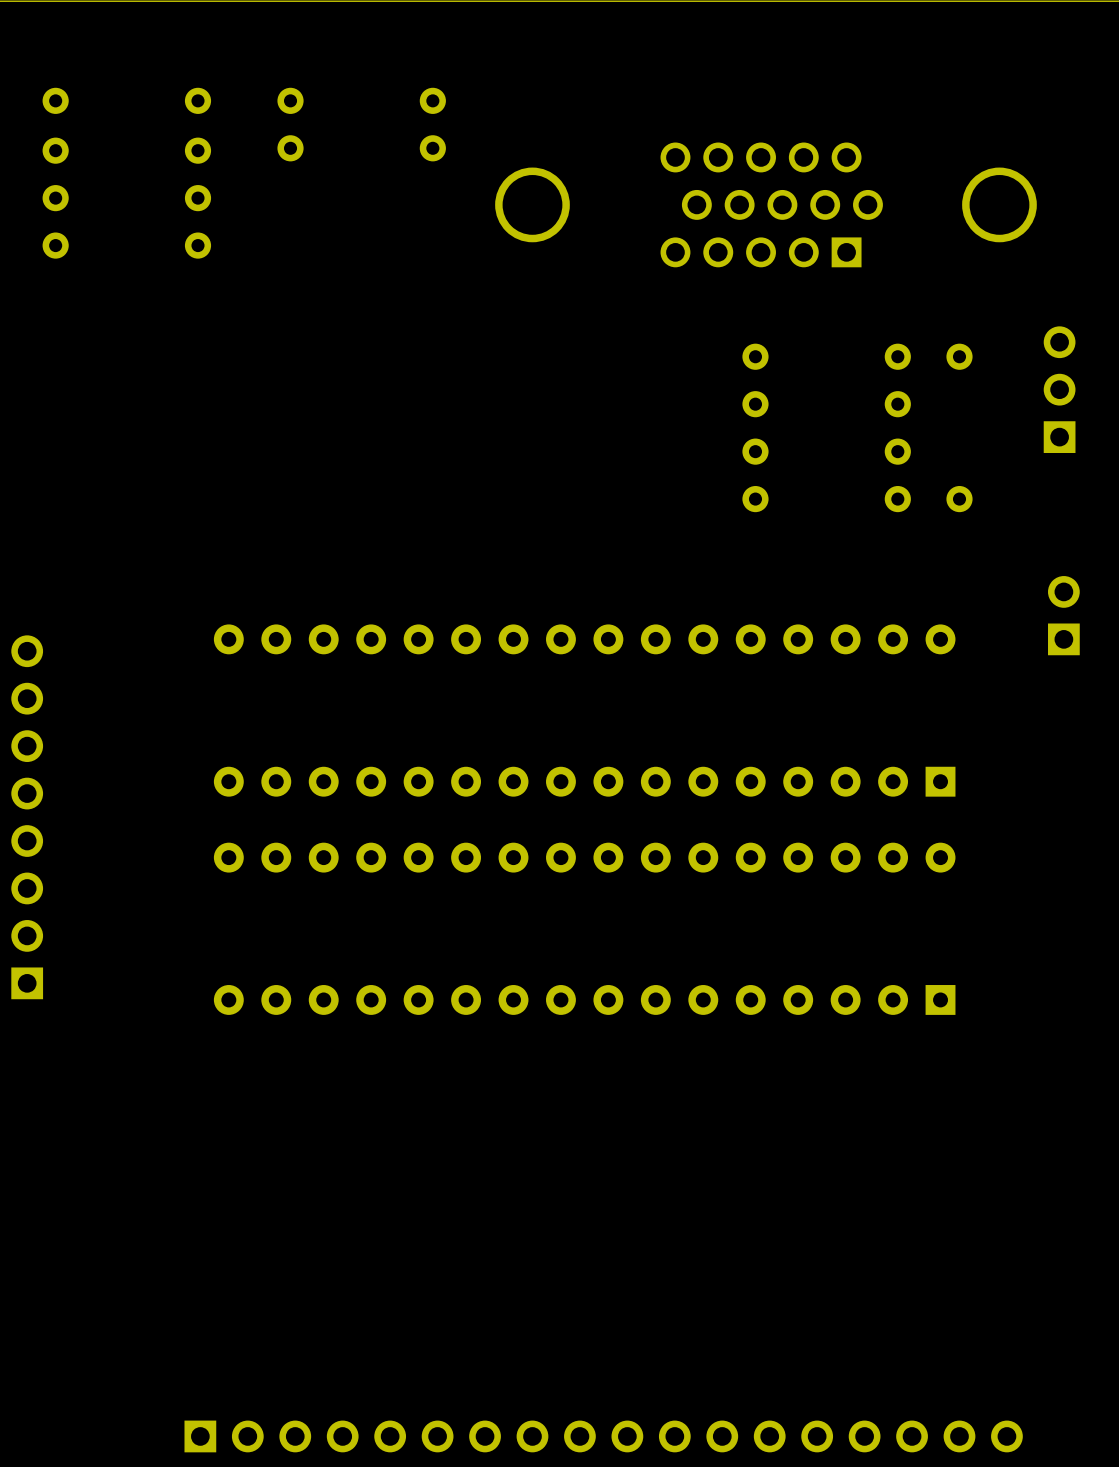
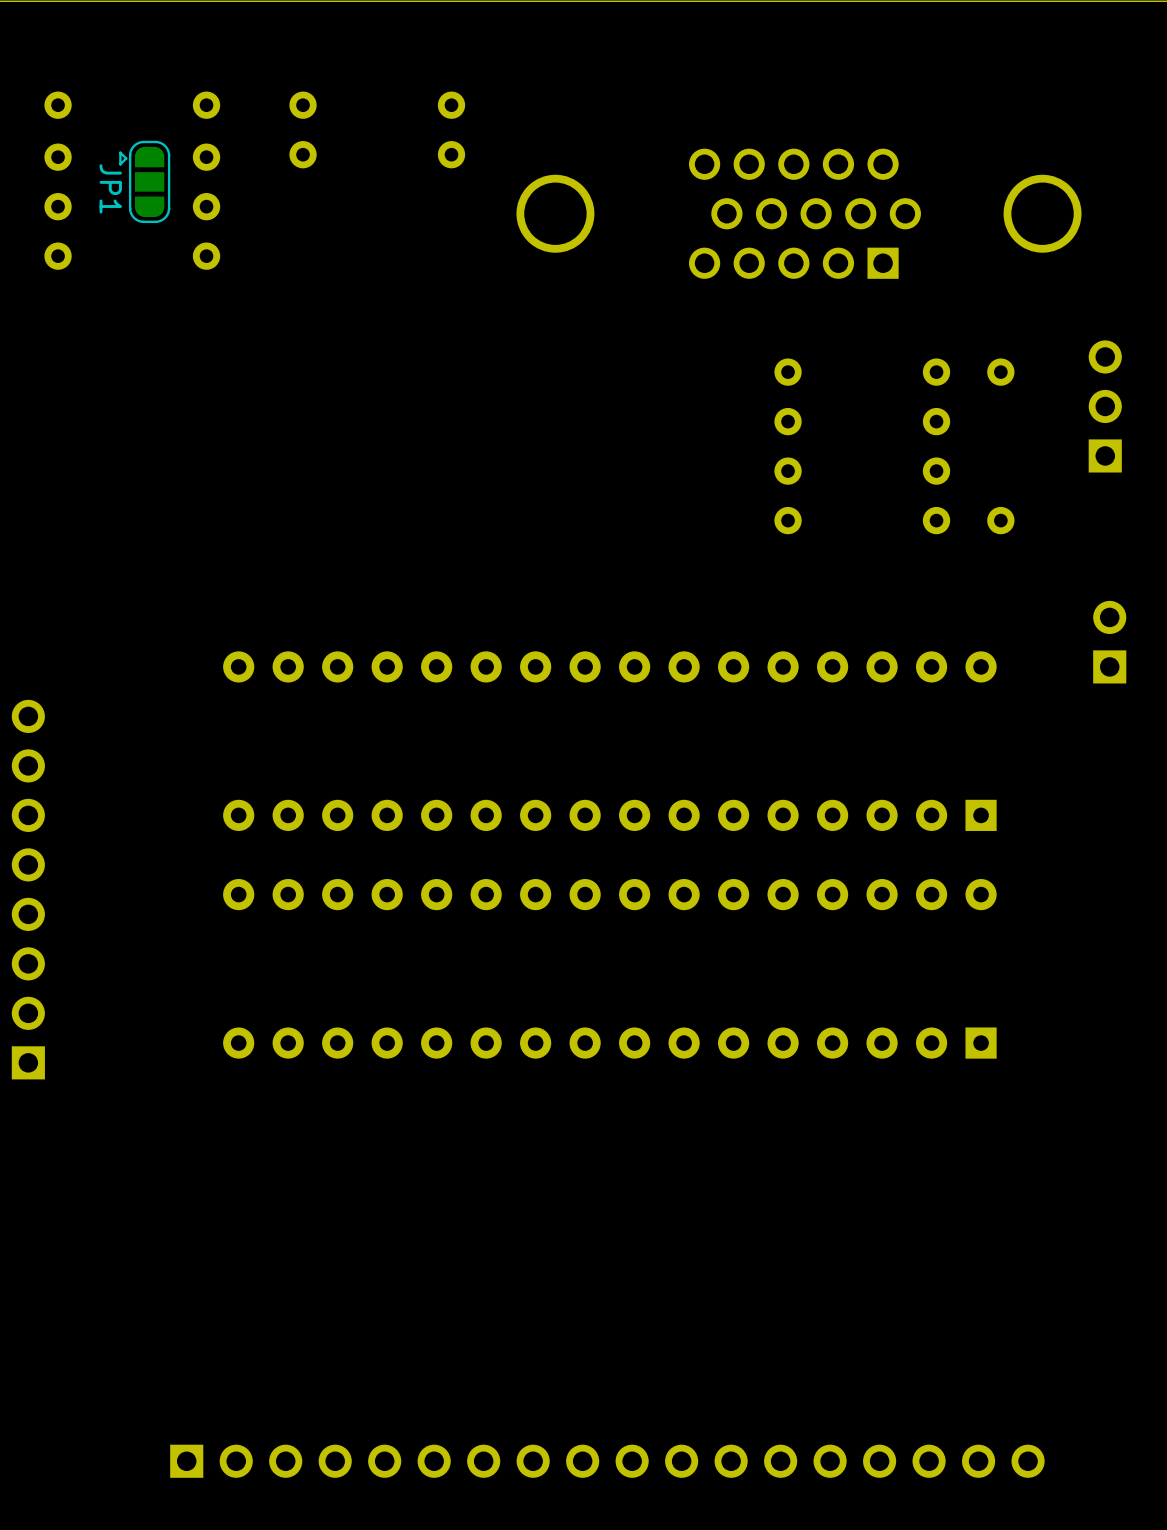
JP1: none -> (144, 181)
part position: (27, 817) -> (28, 889)
part position: (603, 1436) -> (607, 1461)

